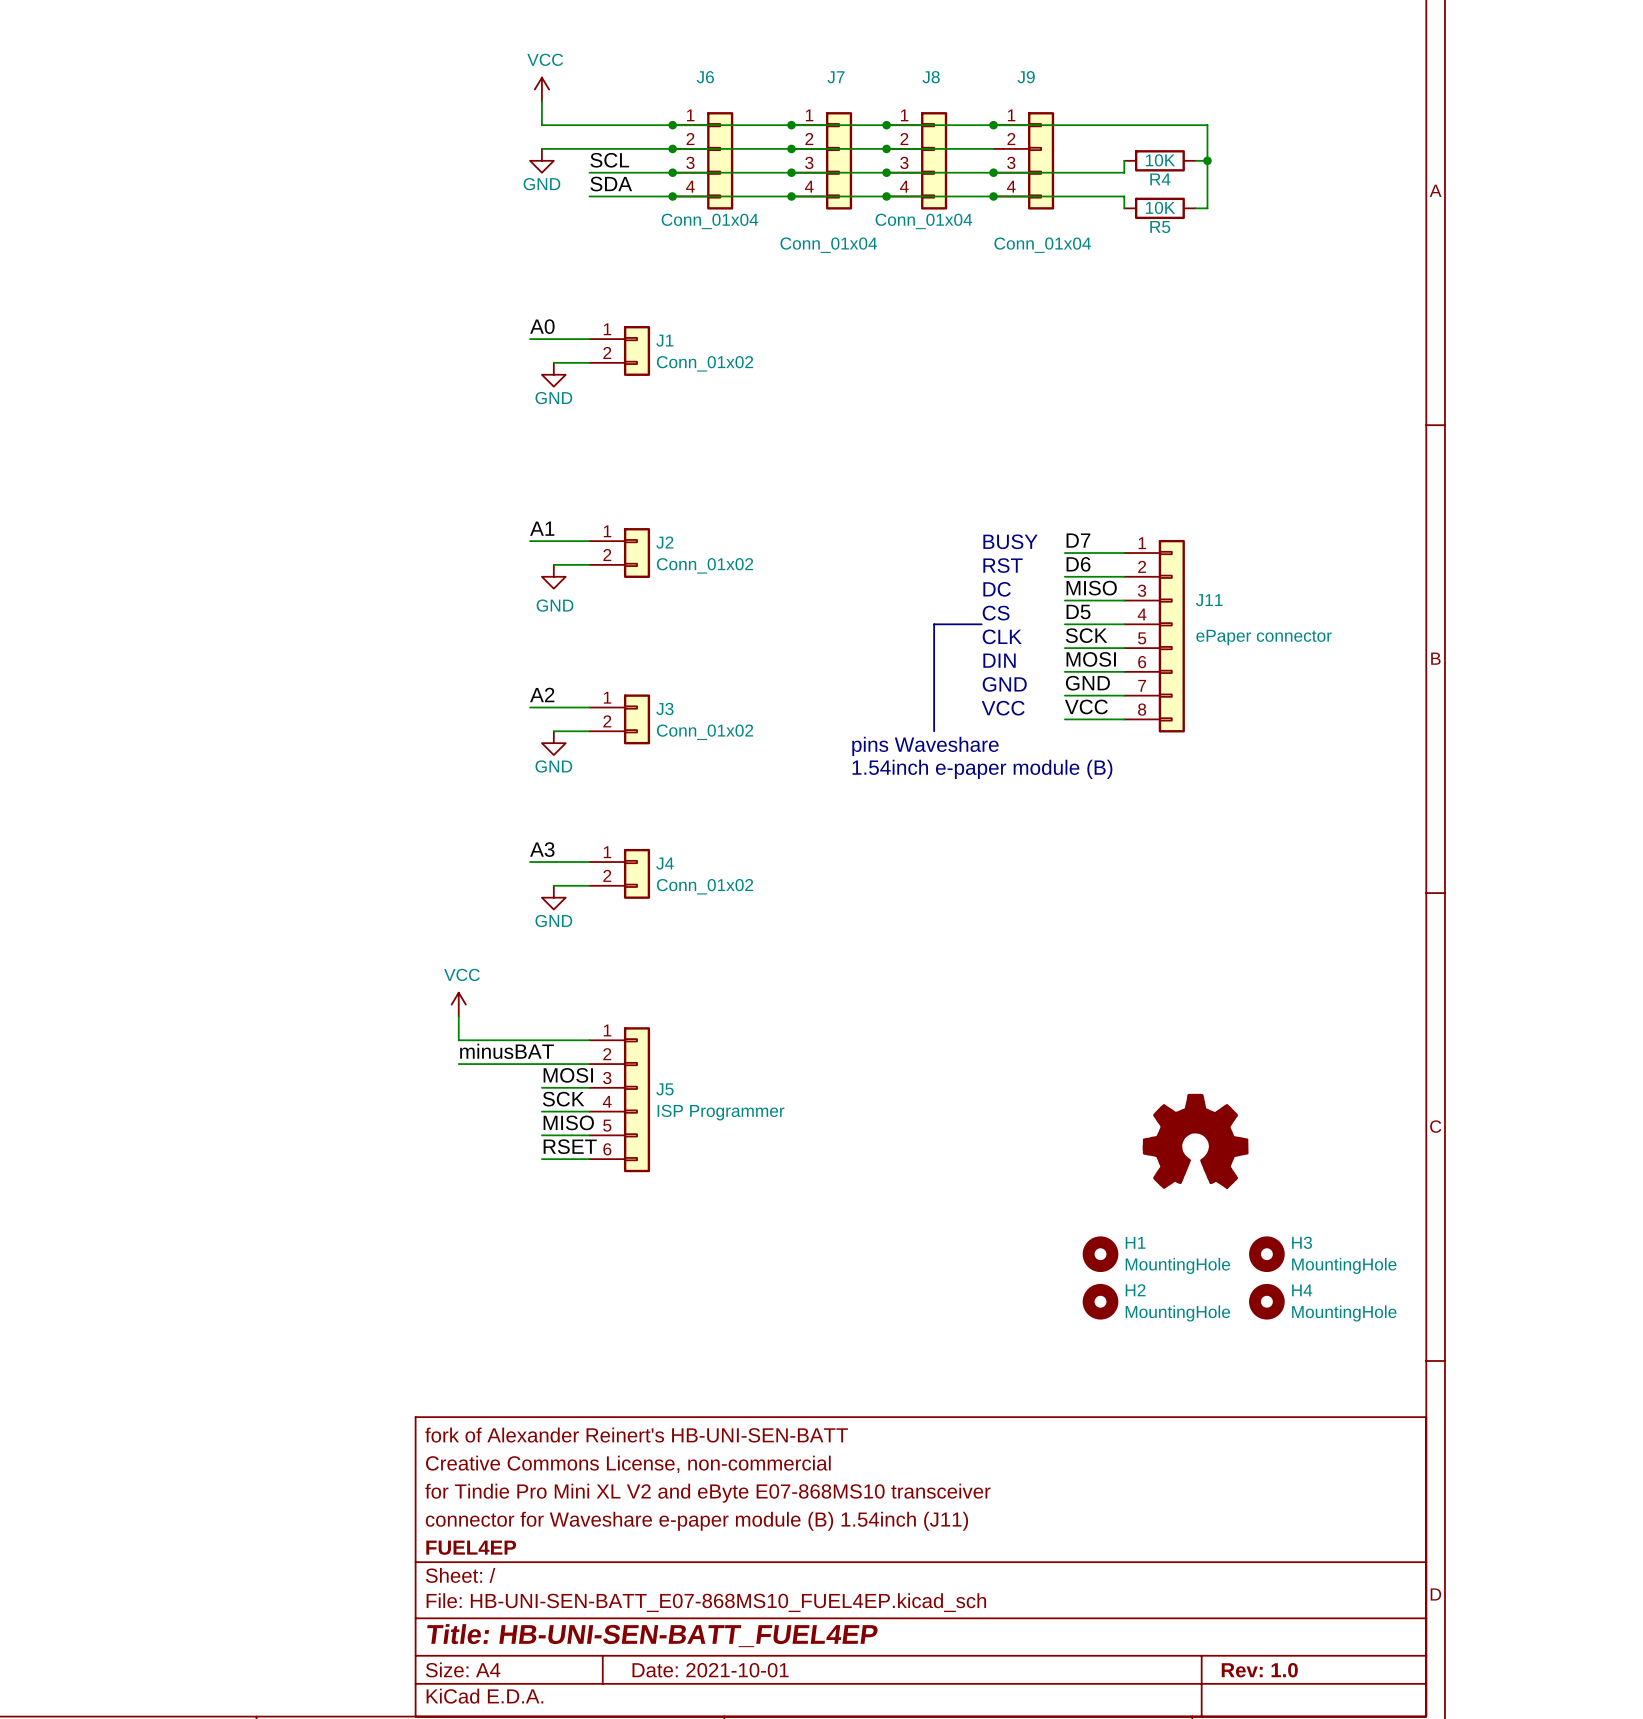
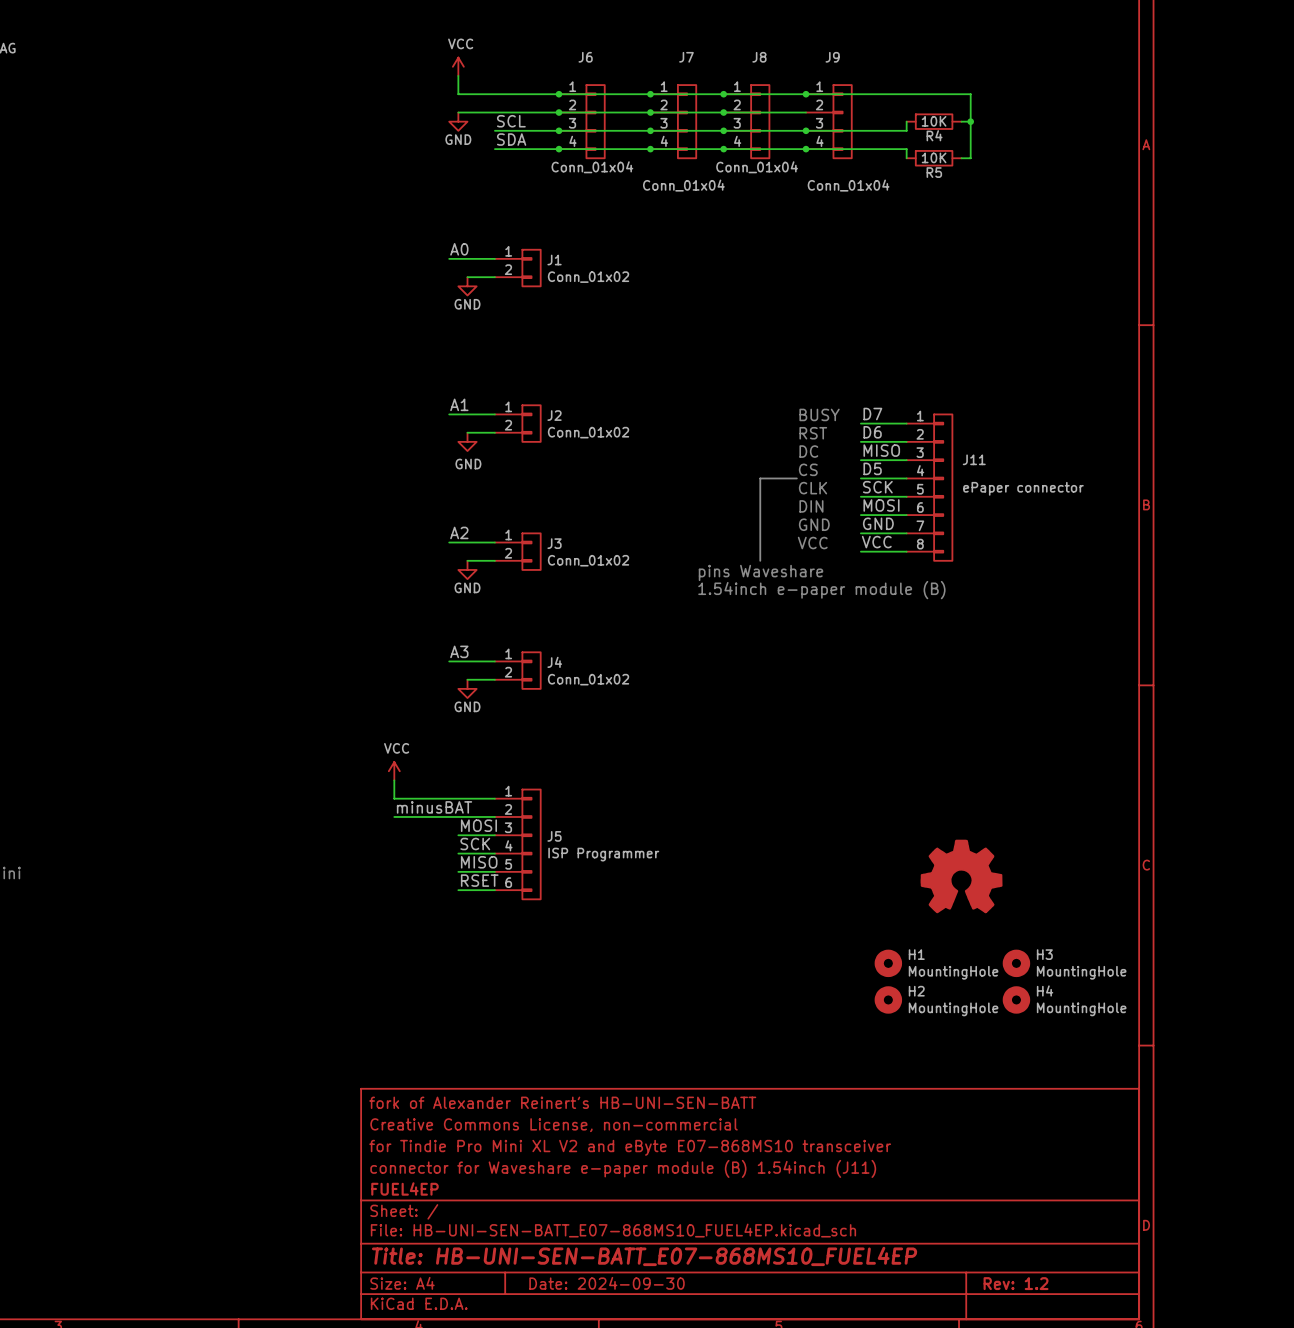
title block: Title: HB-UNI-SEN-BATT_FUEL4EP (652, 1635) -> Title: HB-UNI-SEN-BATT_E07-868MS10_FUEL4EP (644, 1256)
title block: Date: 2021-10-01 (710, 1670) -> Date: 2024-09-30 (607, 1283)
title block: Rev: 1.0 (1259, 1670) -> Rev: 1.2 (1016, 1283)

